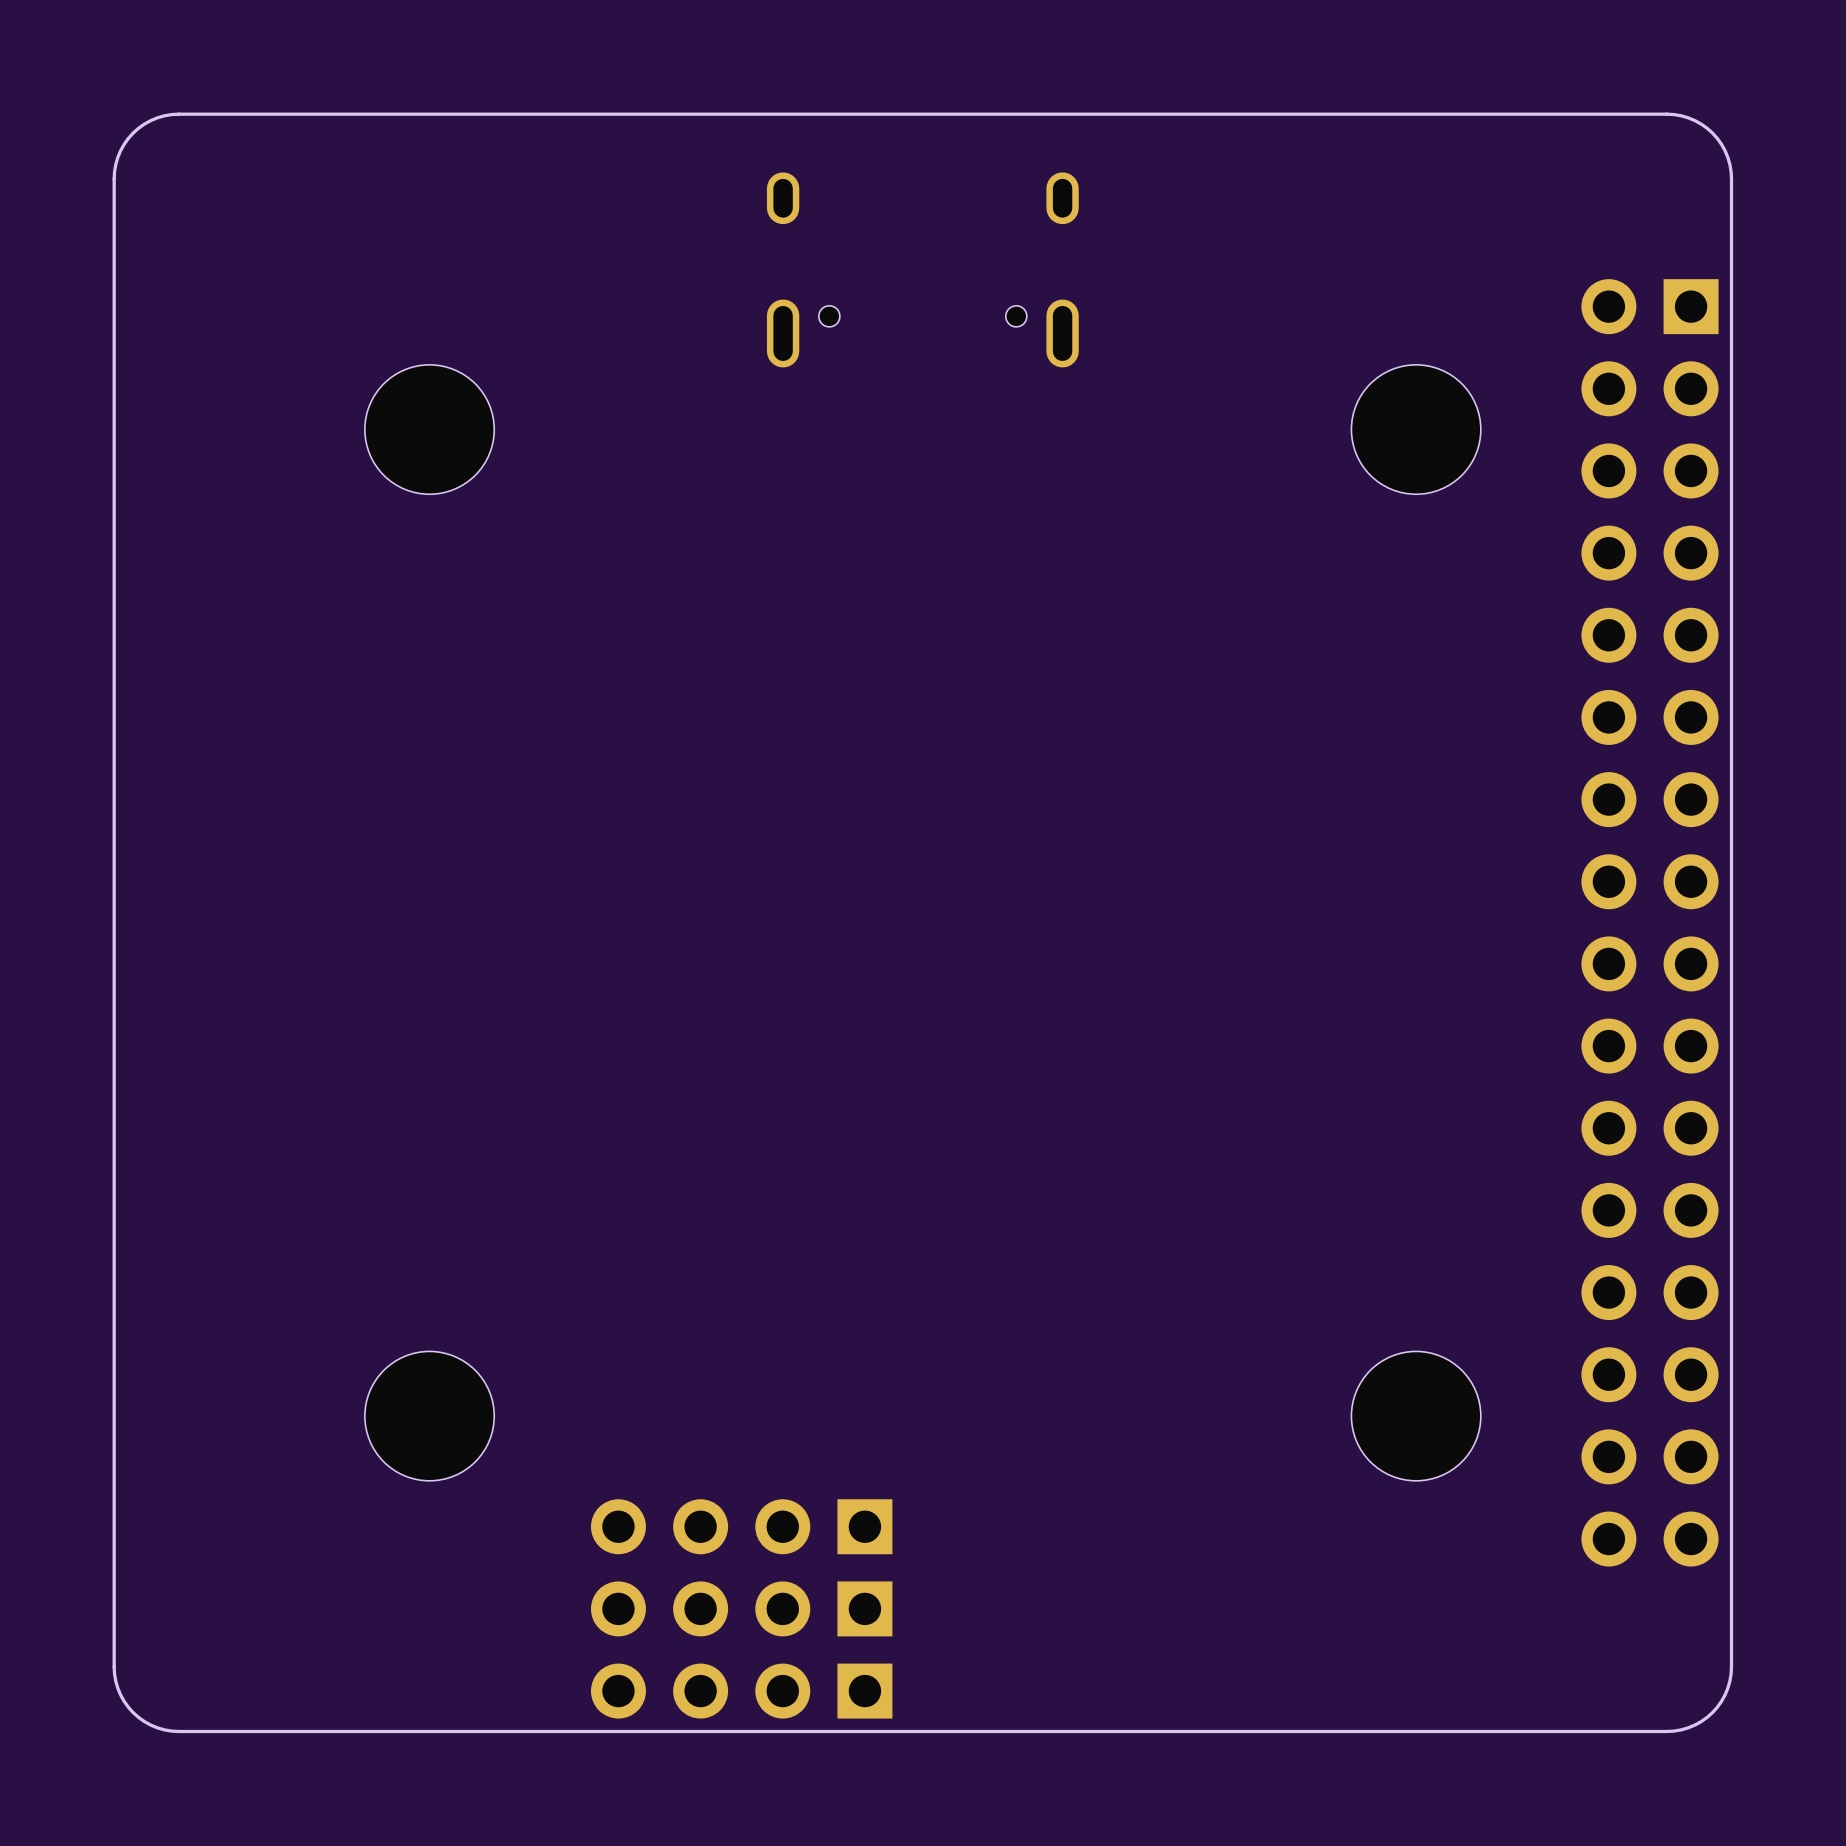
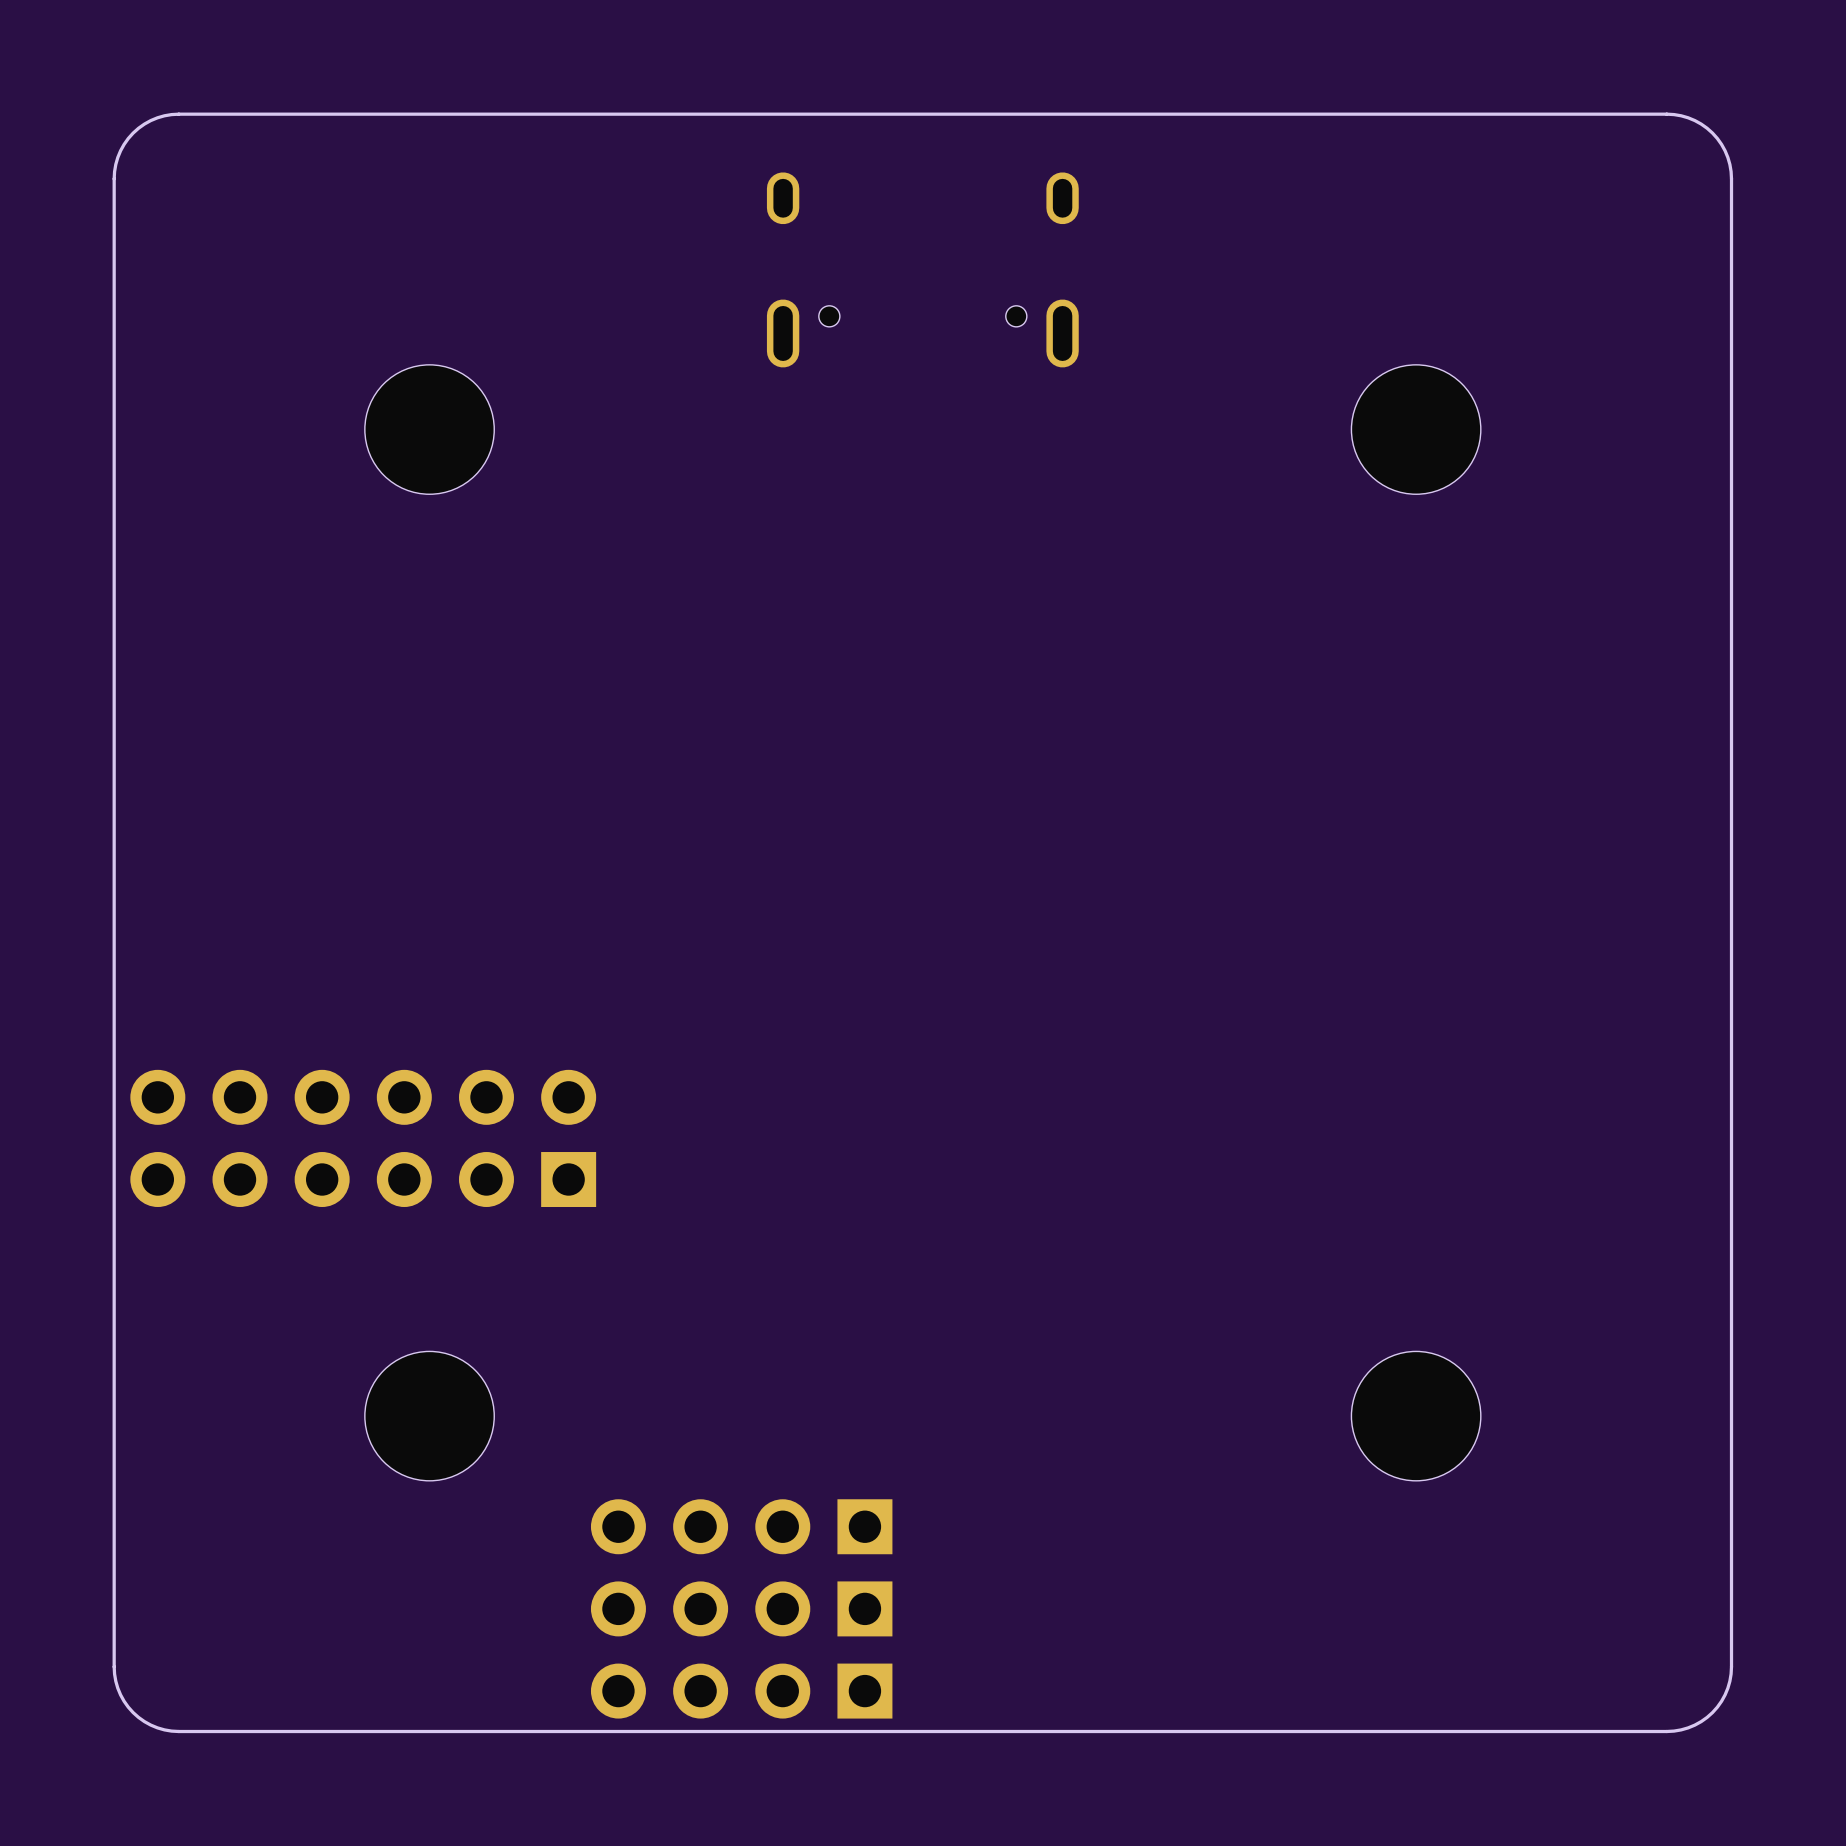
part: (1649, 922) -> none
part: none -> (363, 1138)

